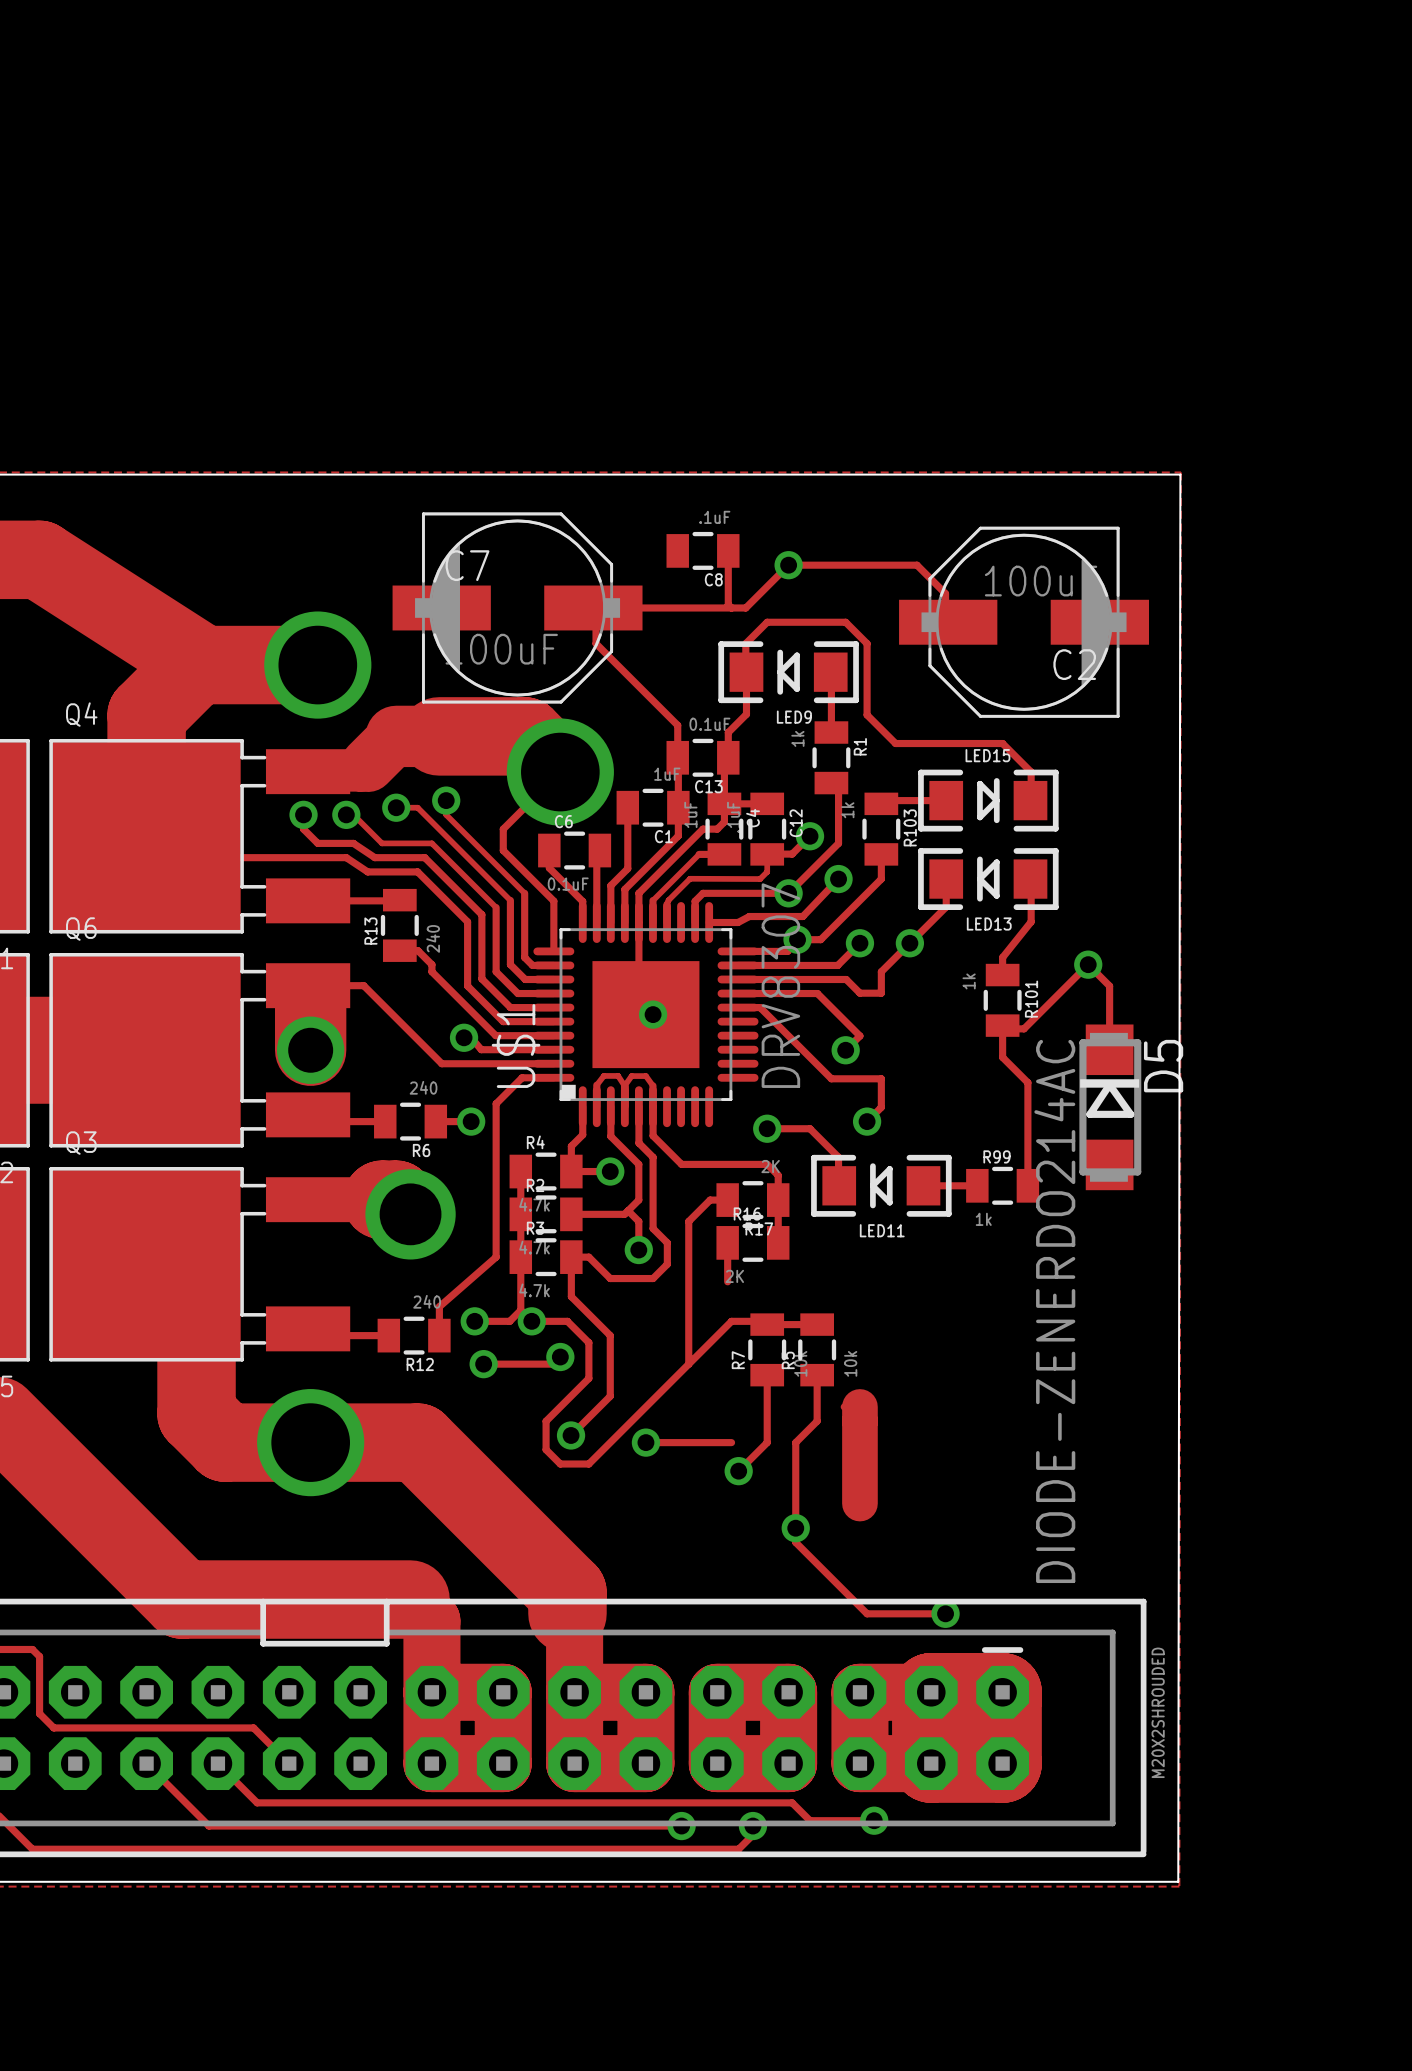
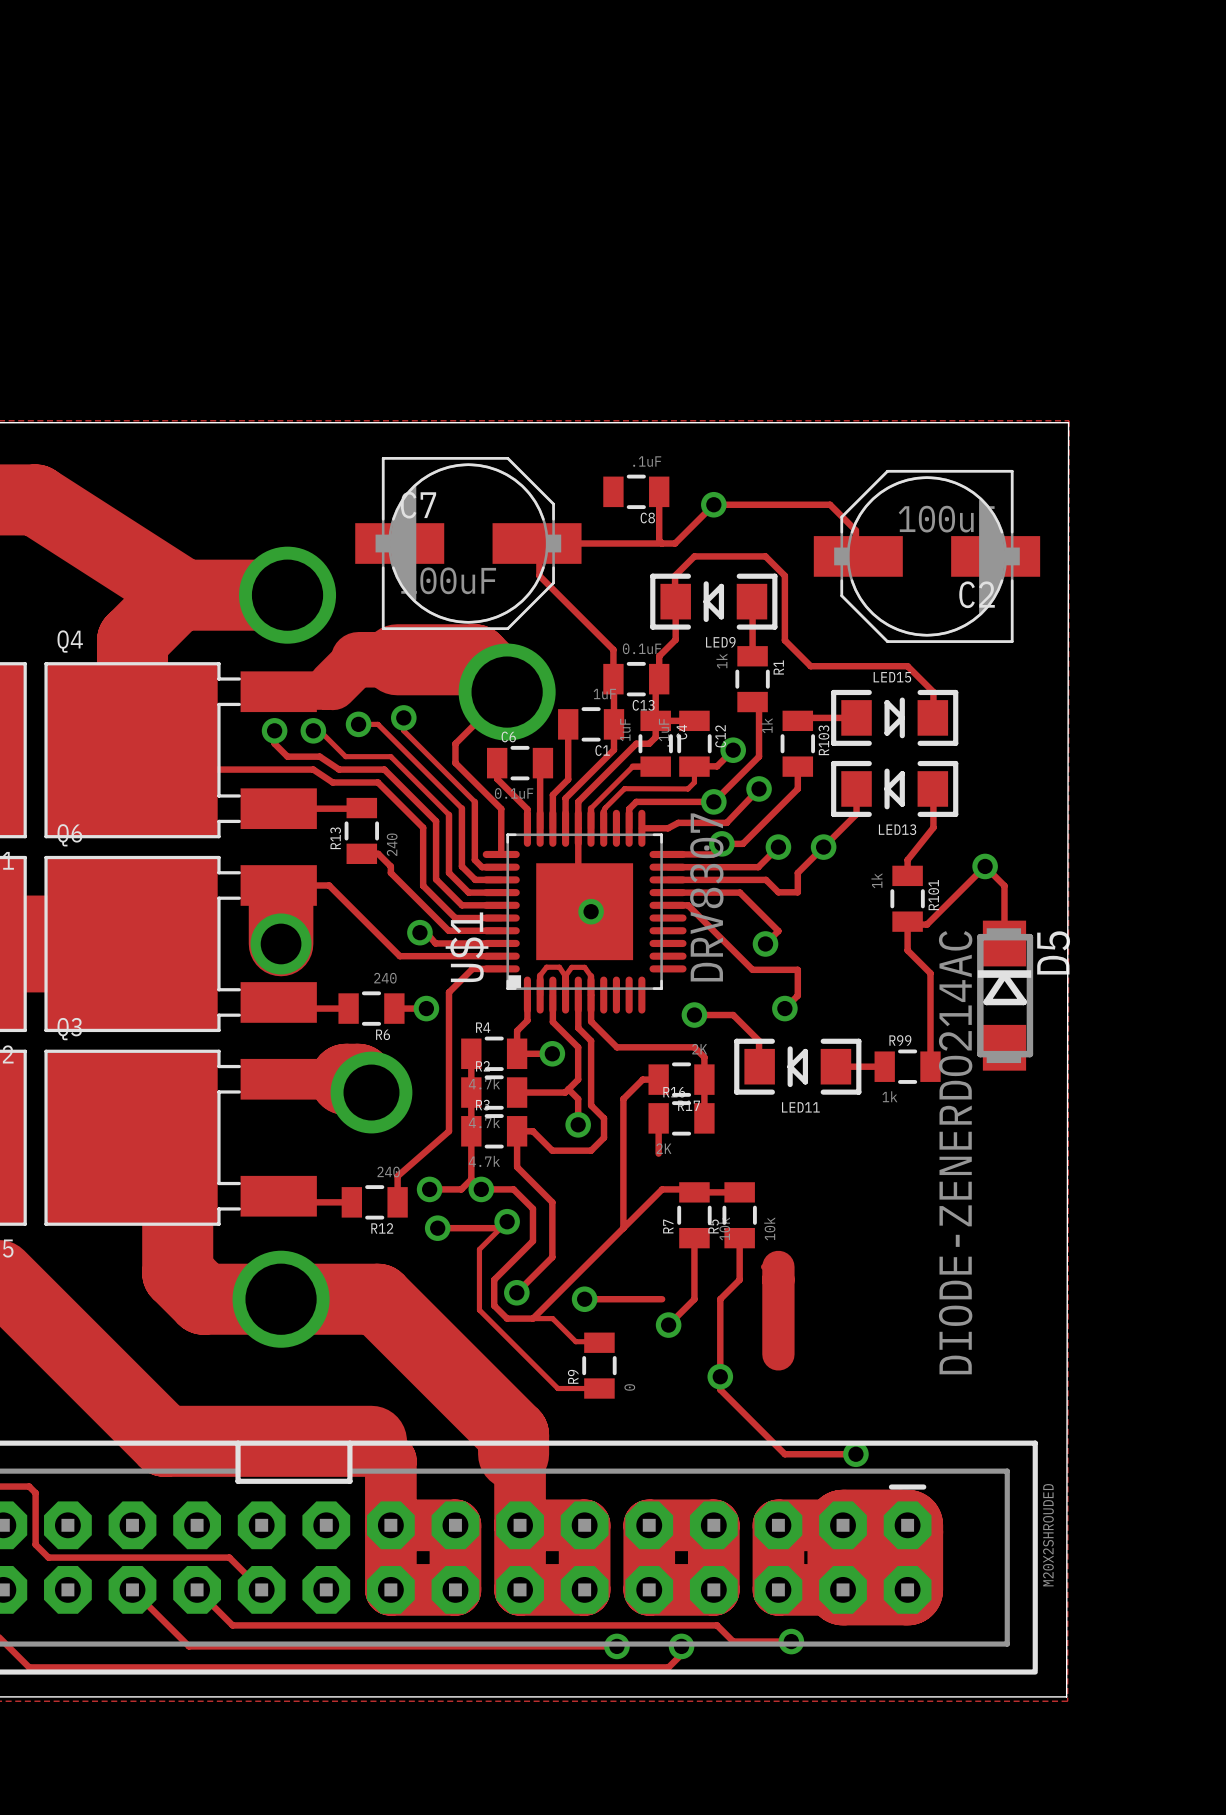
track: none -> (507, 1221) (479, 1249) (479, 1310) (557, 1388) (599, 1388)
track: none -> (532, 1318) (552, 1318) (575, 1341) (599, 1342)
R9: none -> 0 (599, 1365)

